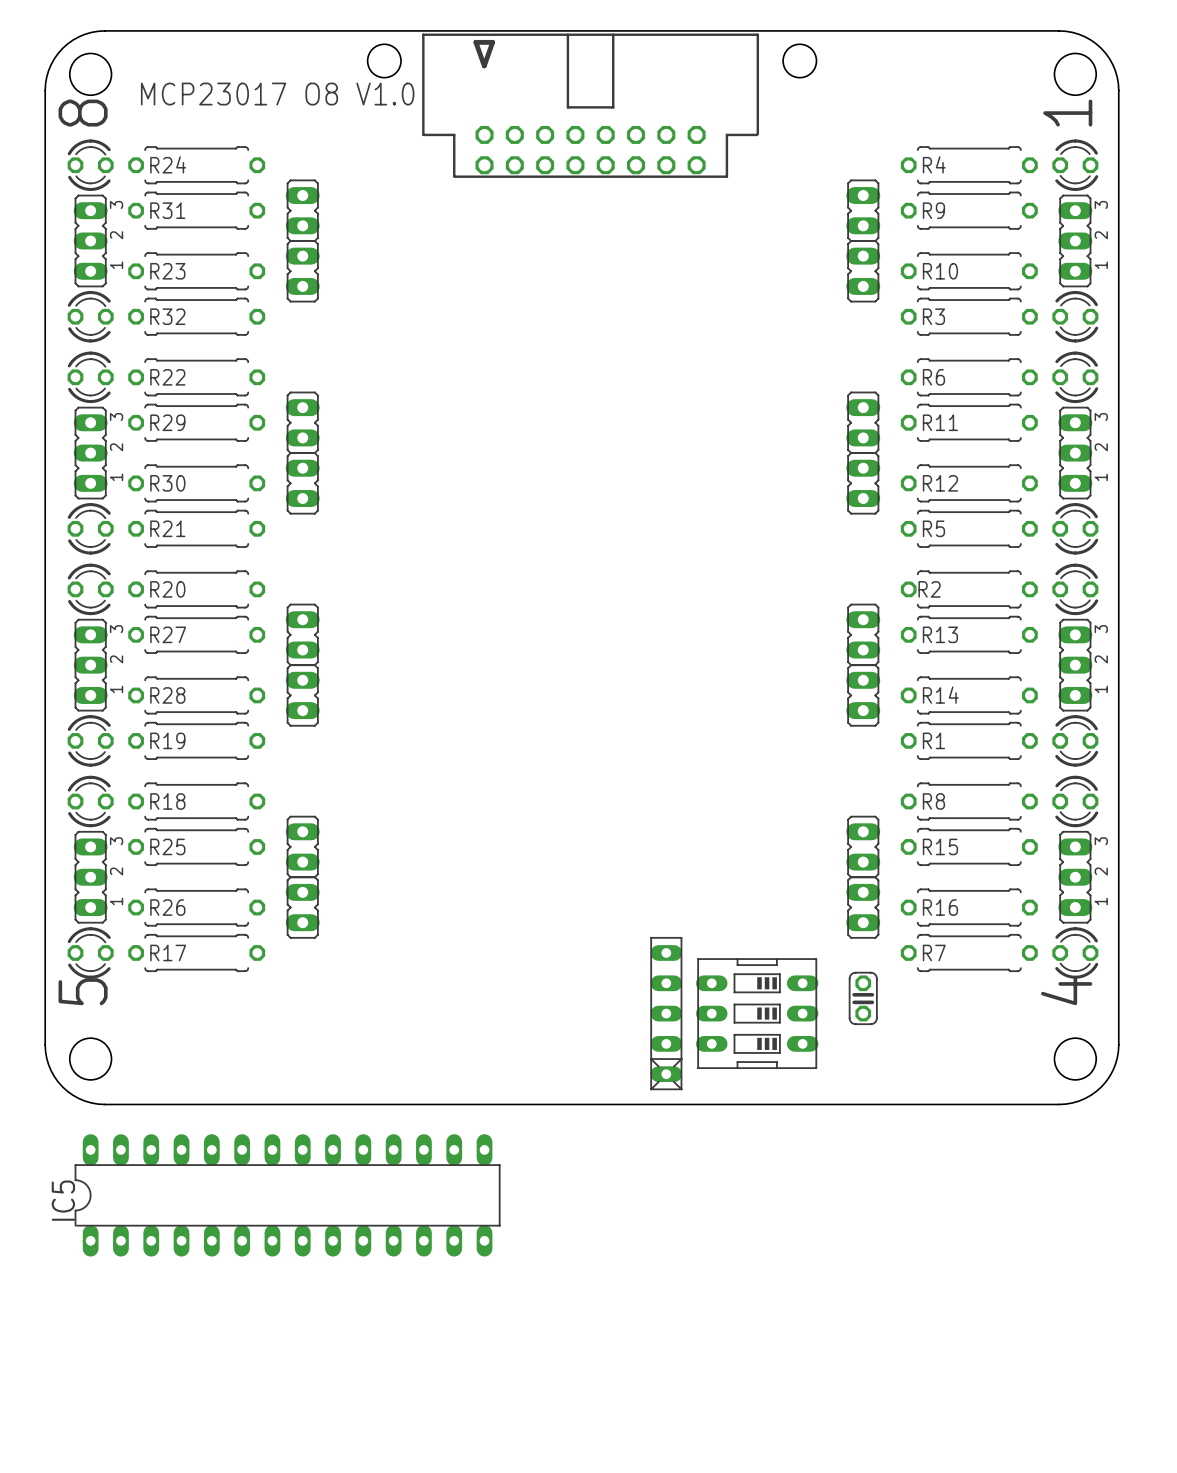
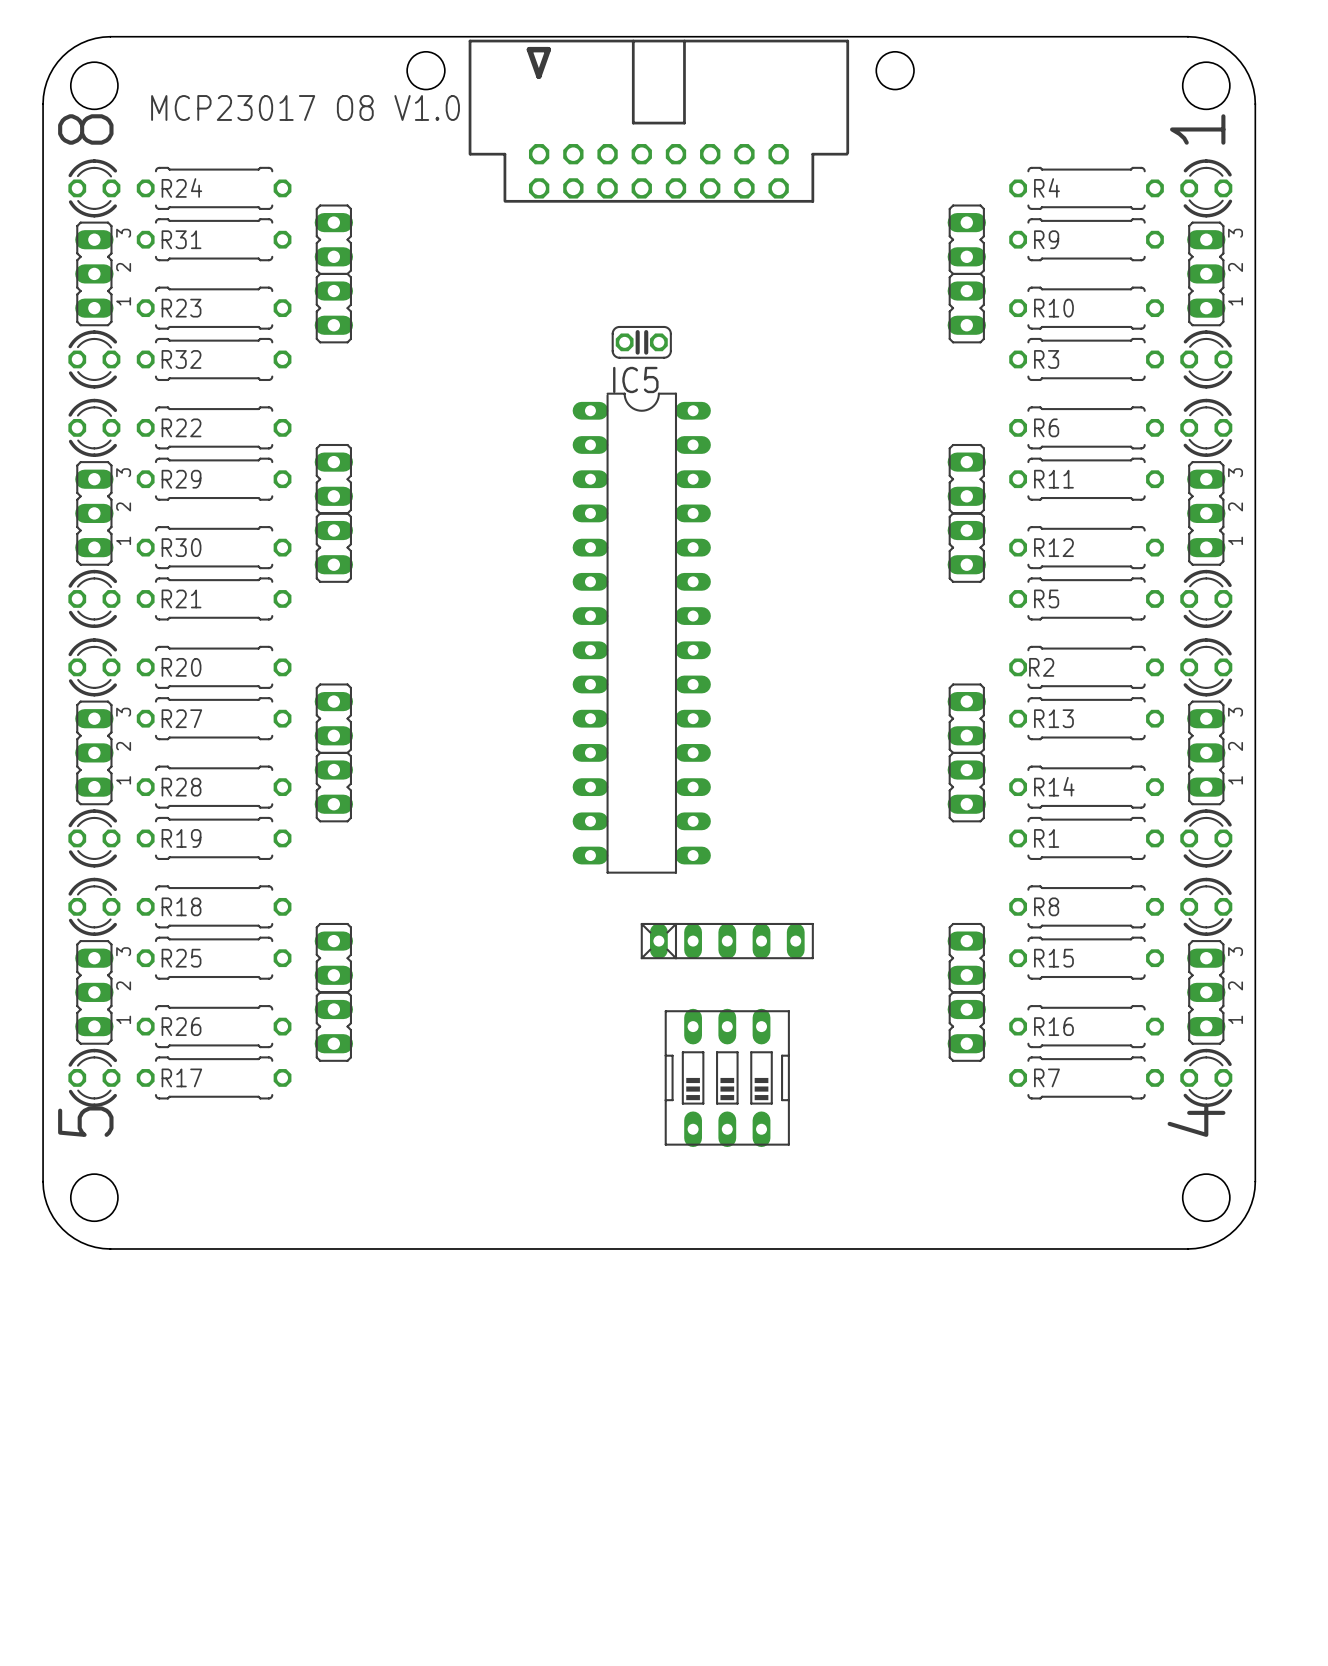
part: none -> (641, 342)
part: (863, 998) -> none
part rotation: 0° (666, 1013) -> 90° clockwise (727, 941)
part position: (666, 1013) -> (727, 941)
part rotation: 0° (757, 1013) -> 90° clockwise (727, 1077)
part position: (757, 1013) -> (727, 1077)
IC5 rotation: 0° (287, 1195) -> 90° clockwise (641, 633)
IC5 position: (287, 1195) -> (641, 633)

